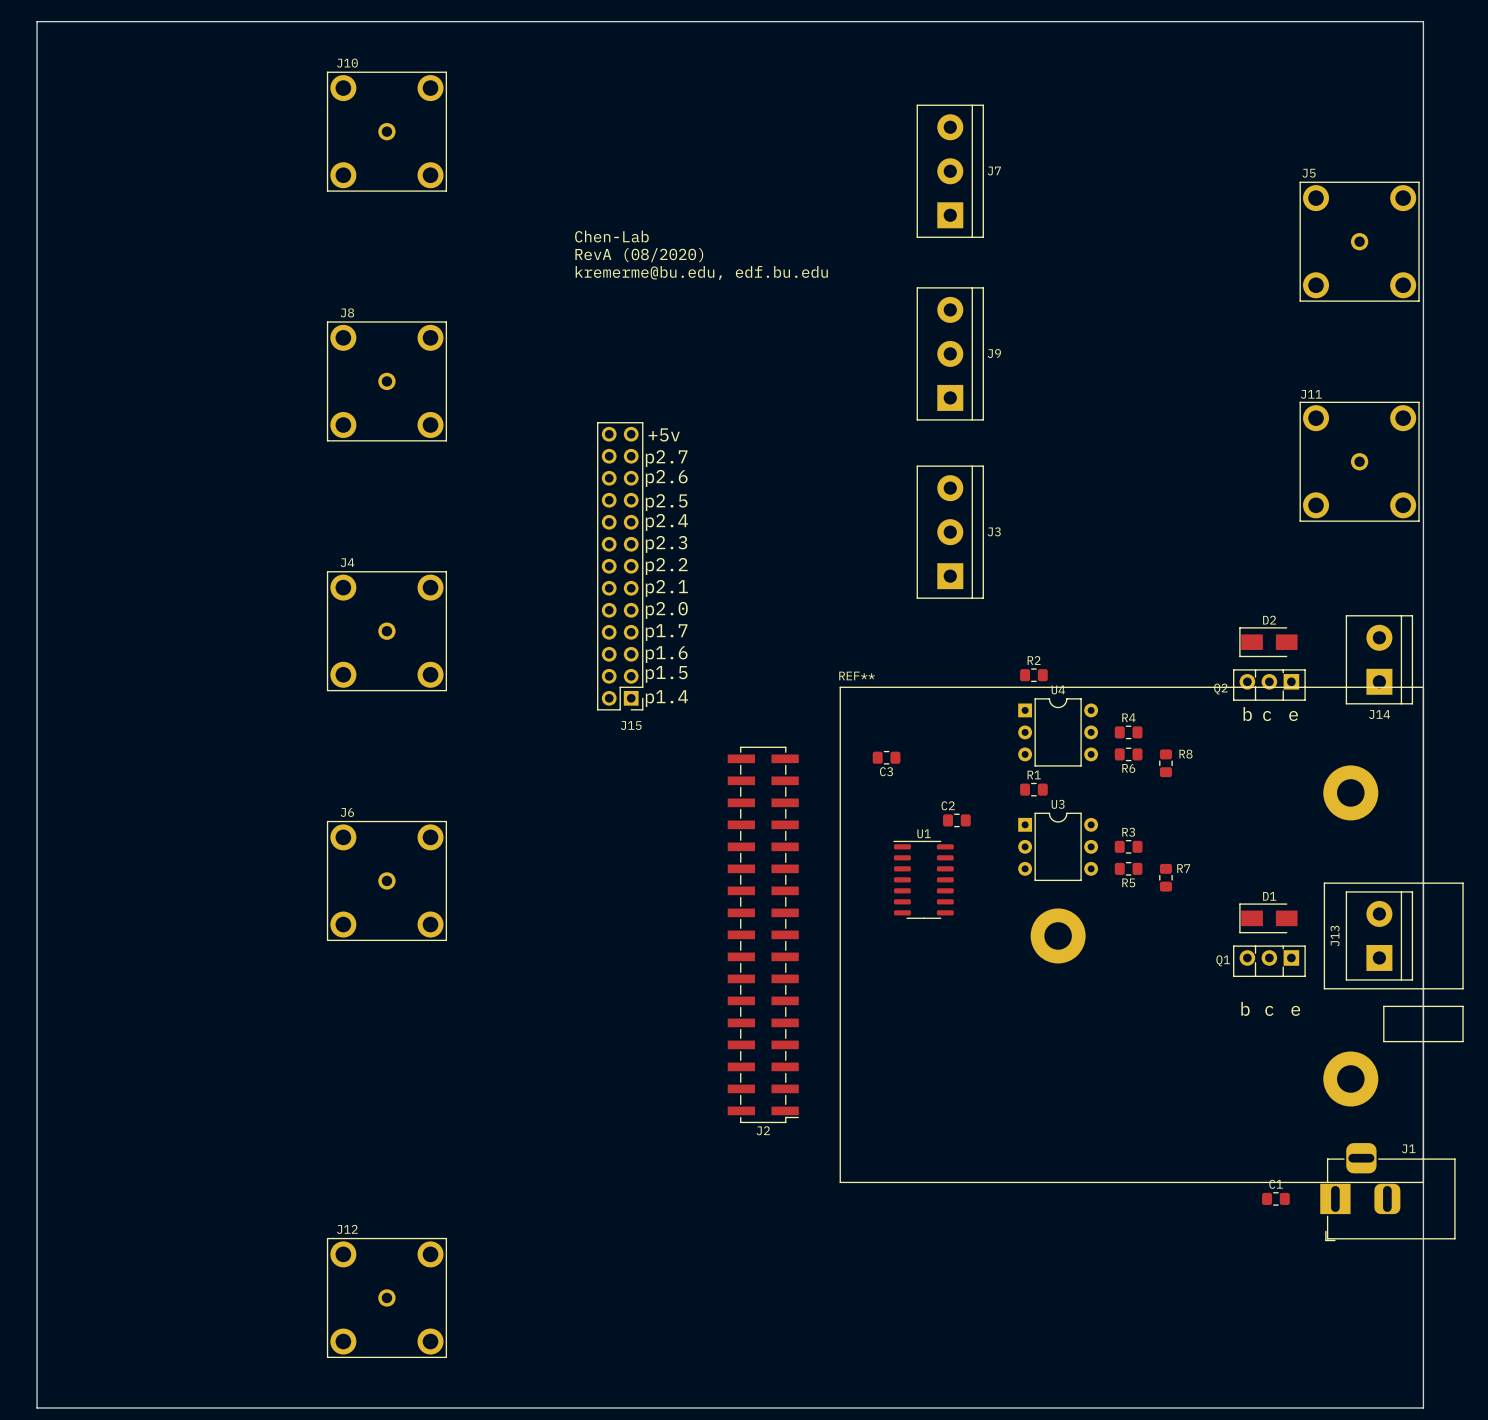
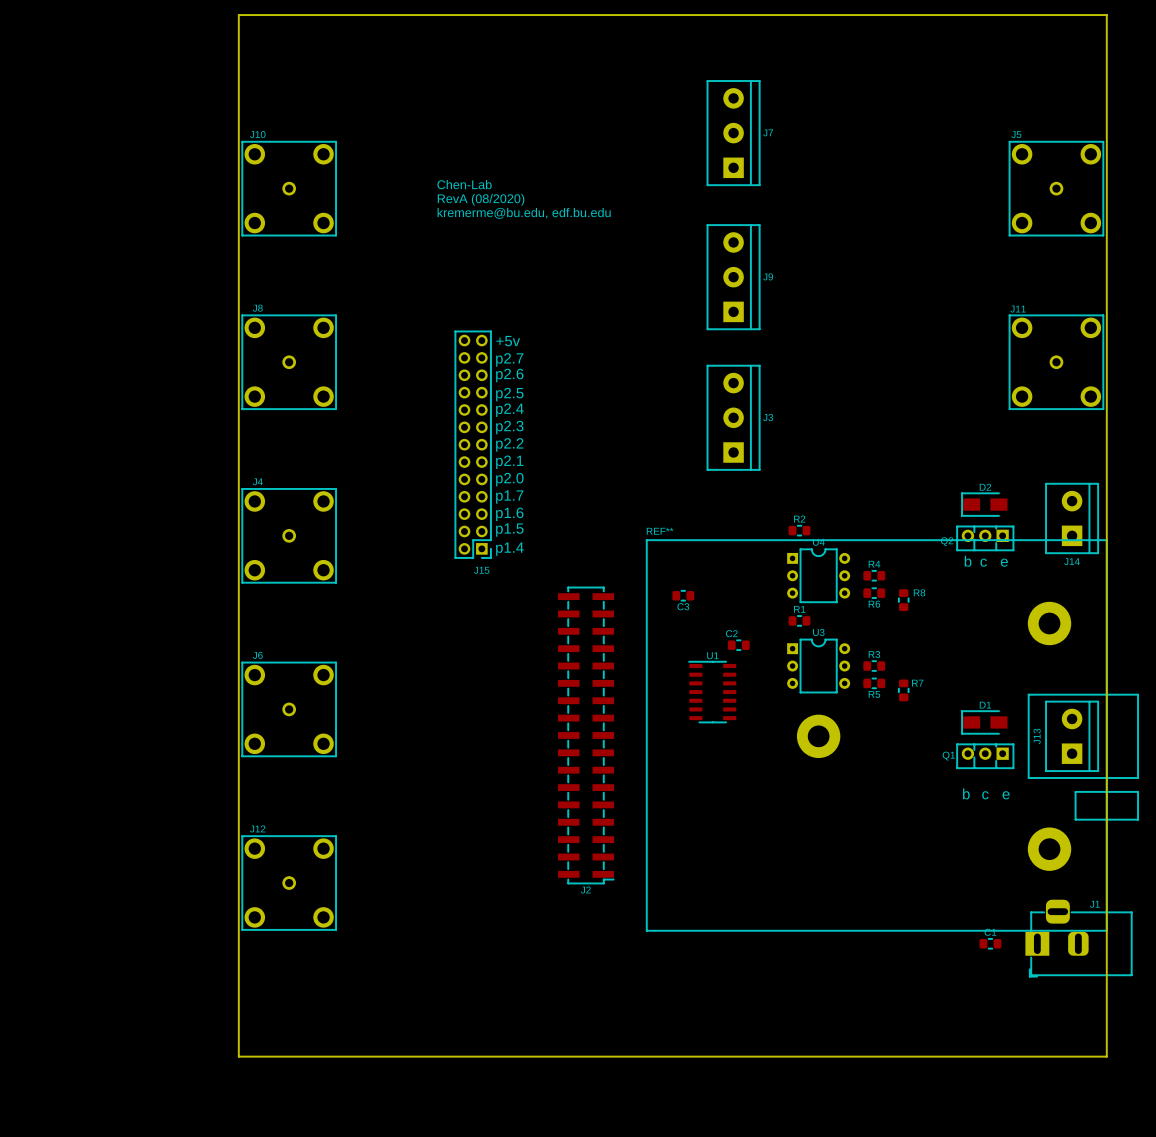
board edge: (323, 21) (37, 21) (37, 1407) (1423, 1407) (1423, 1341) -> (238, 15) (238, 1056) (1106, 1056)
J10 position: (386, 131) -> (289, 188)
J8 position: (386, 381) -> (289, 362)
J4 position: (386, 631) -> (289, 535)
J6 position: (386, 880) -> (289, 709)
J12 position: (386, 1297) -> (289, 883)

